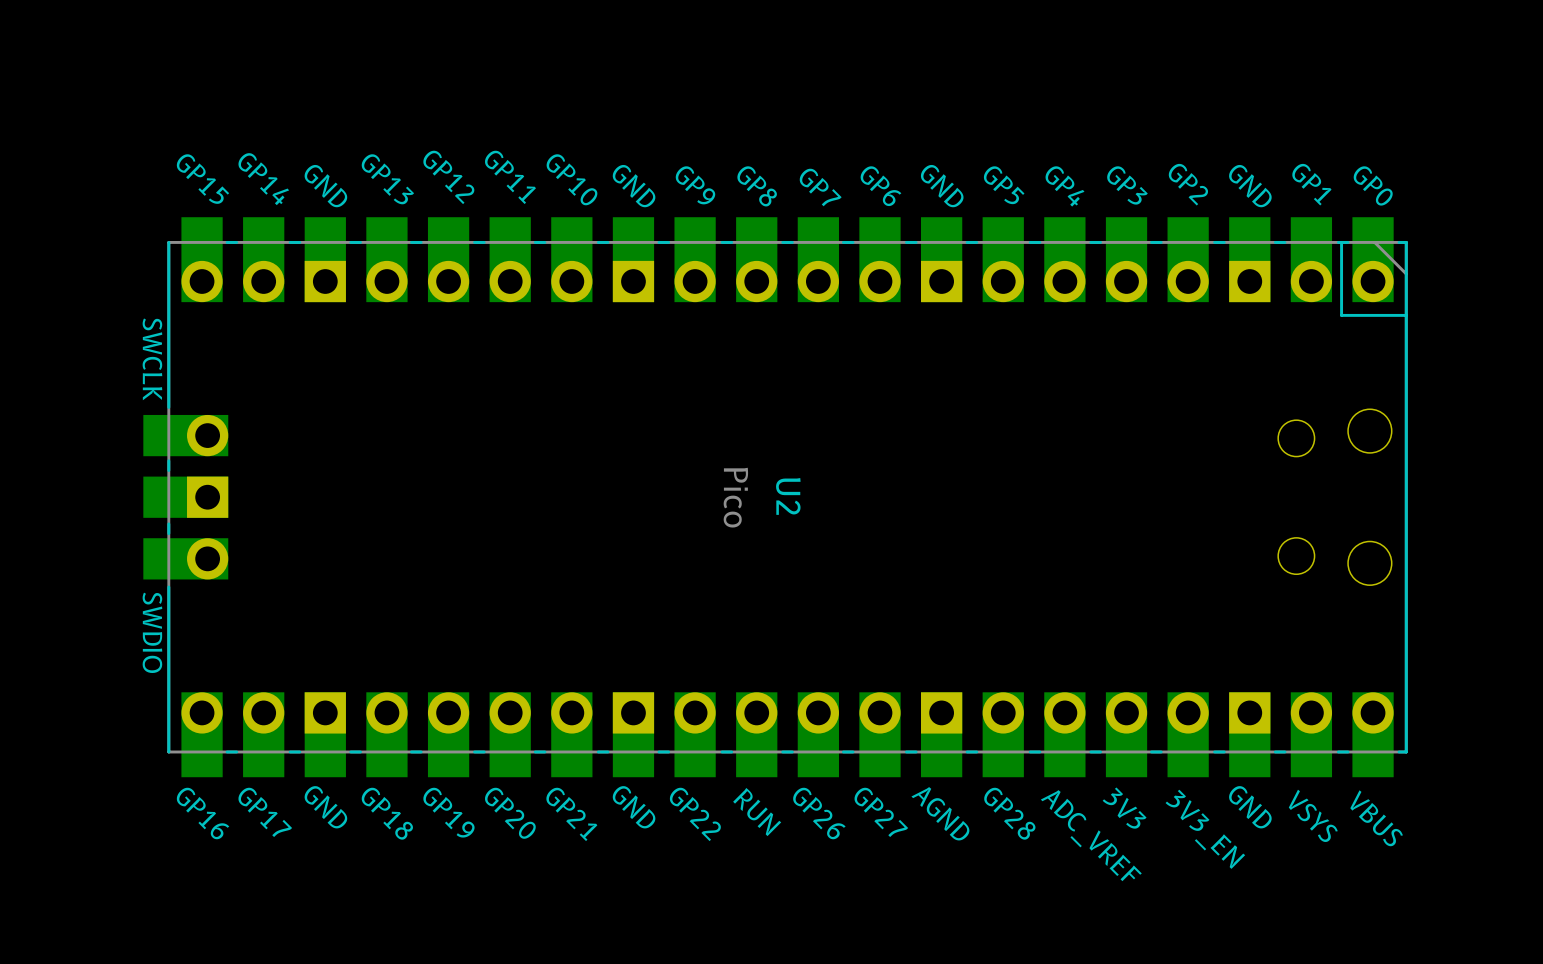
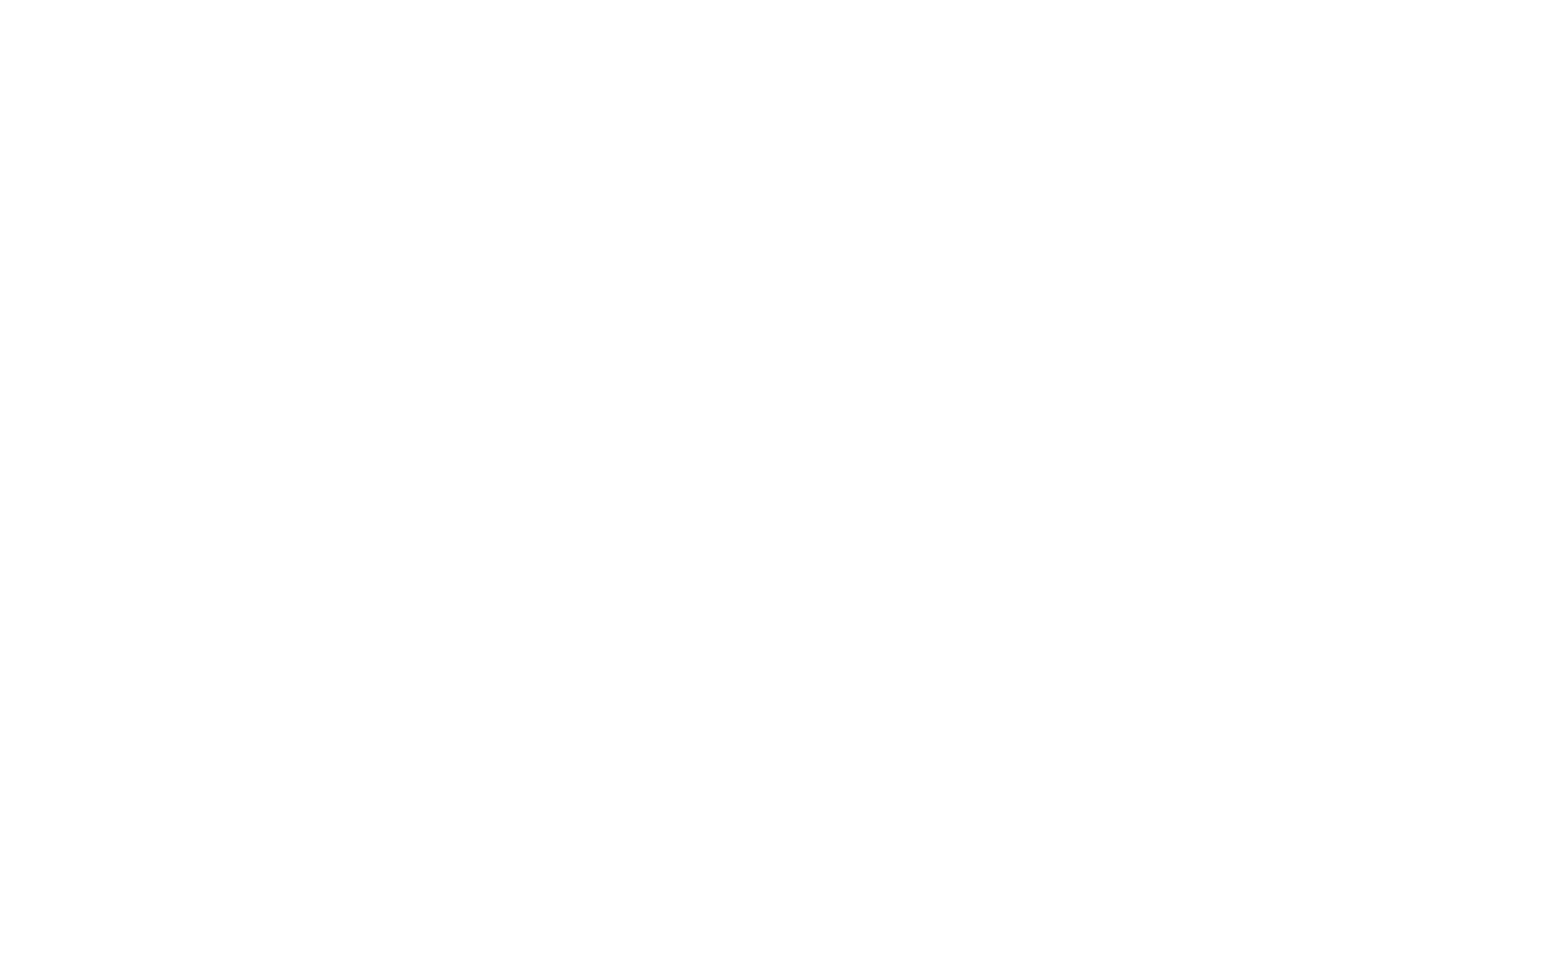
U2: Pico (775, 497) -> none

